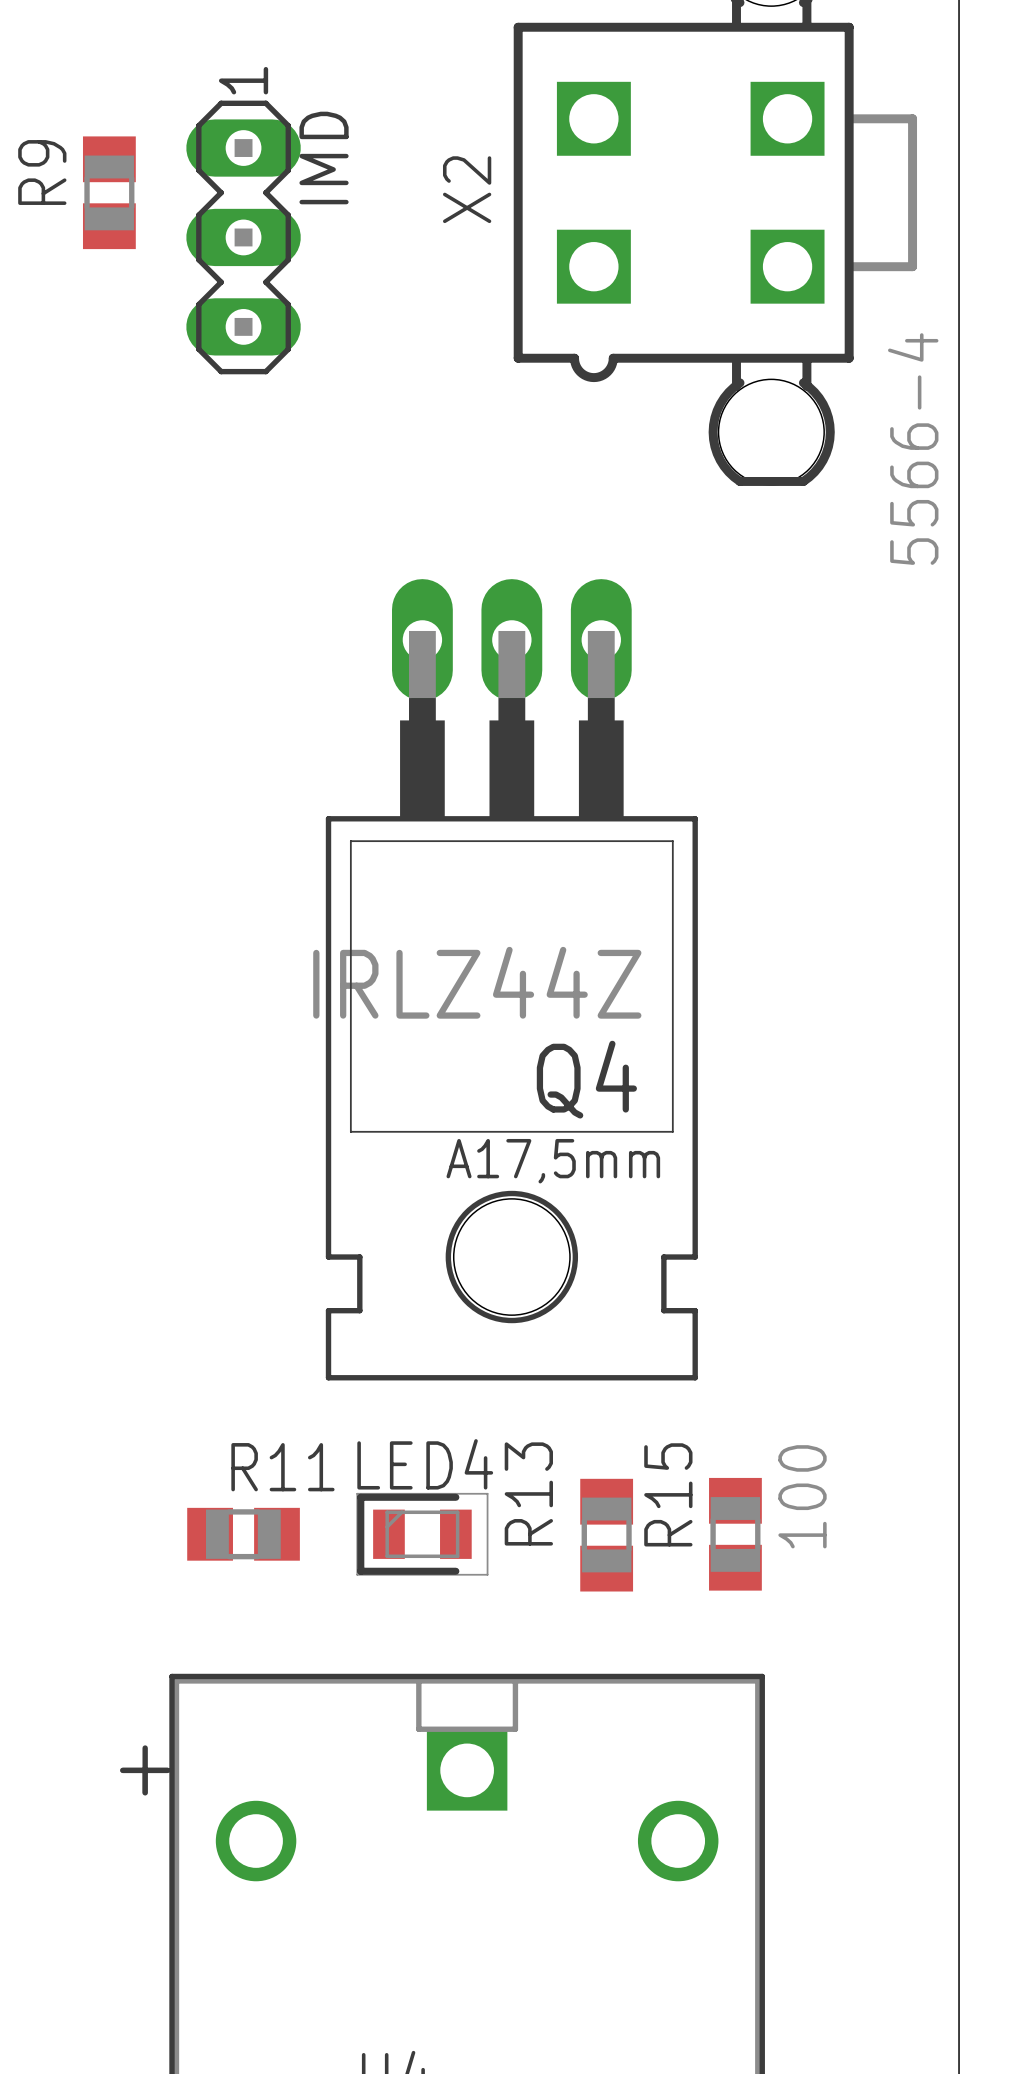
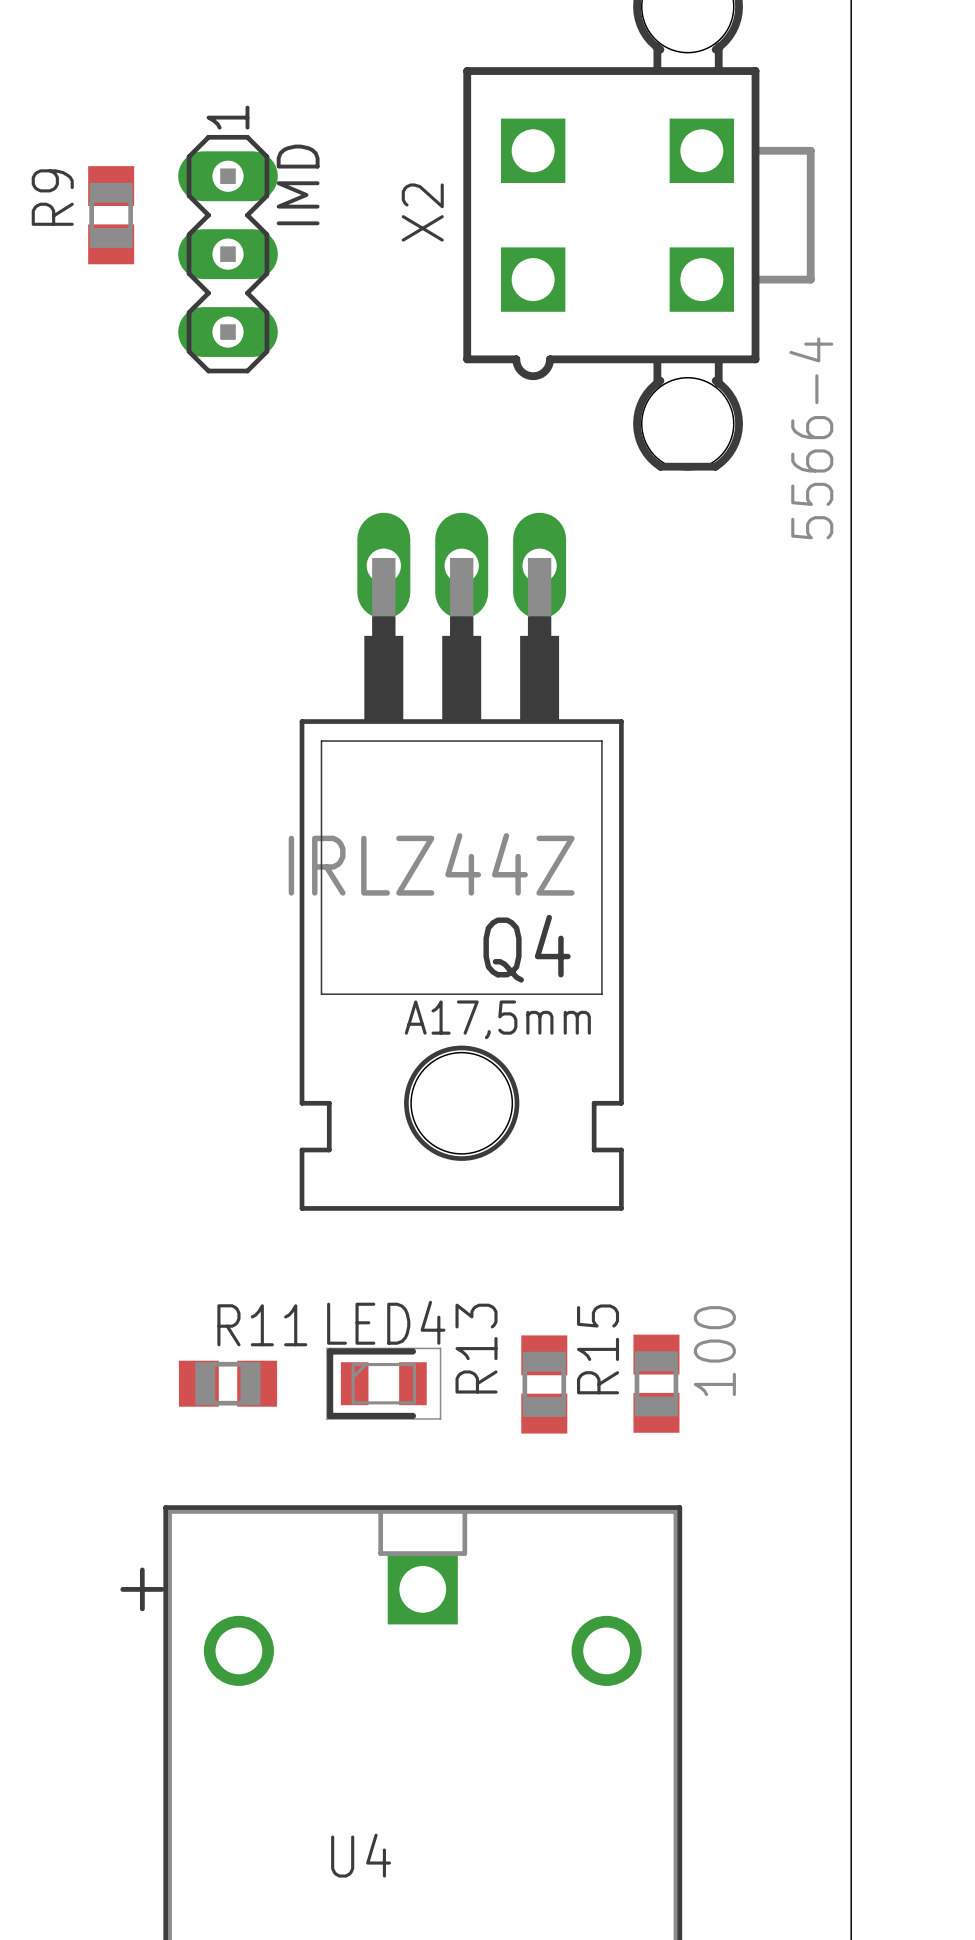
Q4 position: (511, 979) -> (461, 861)

